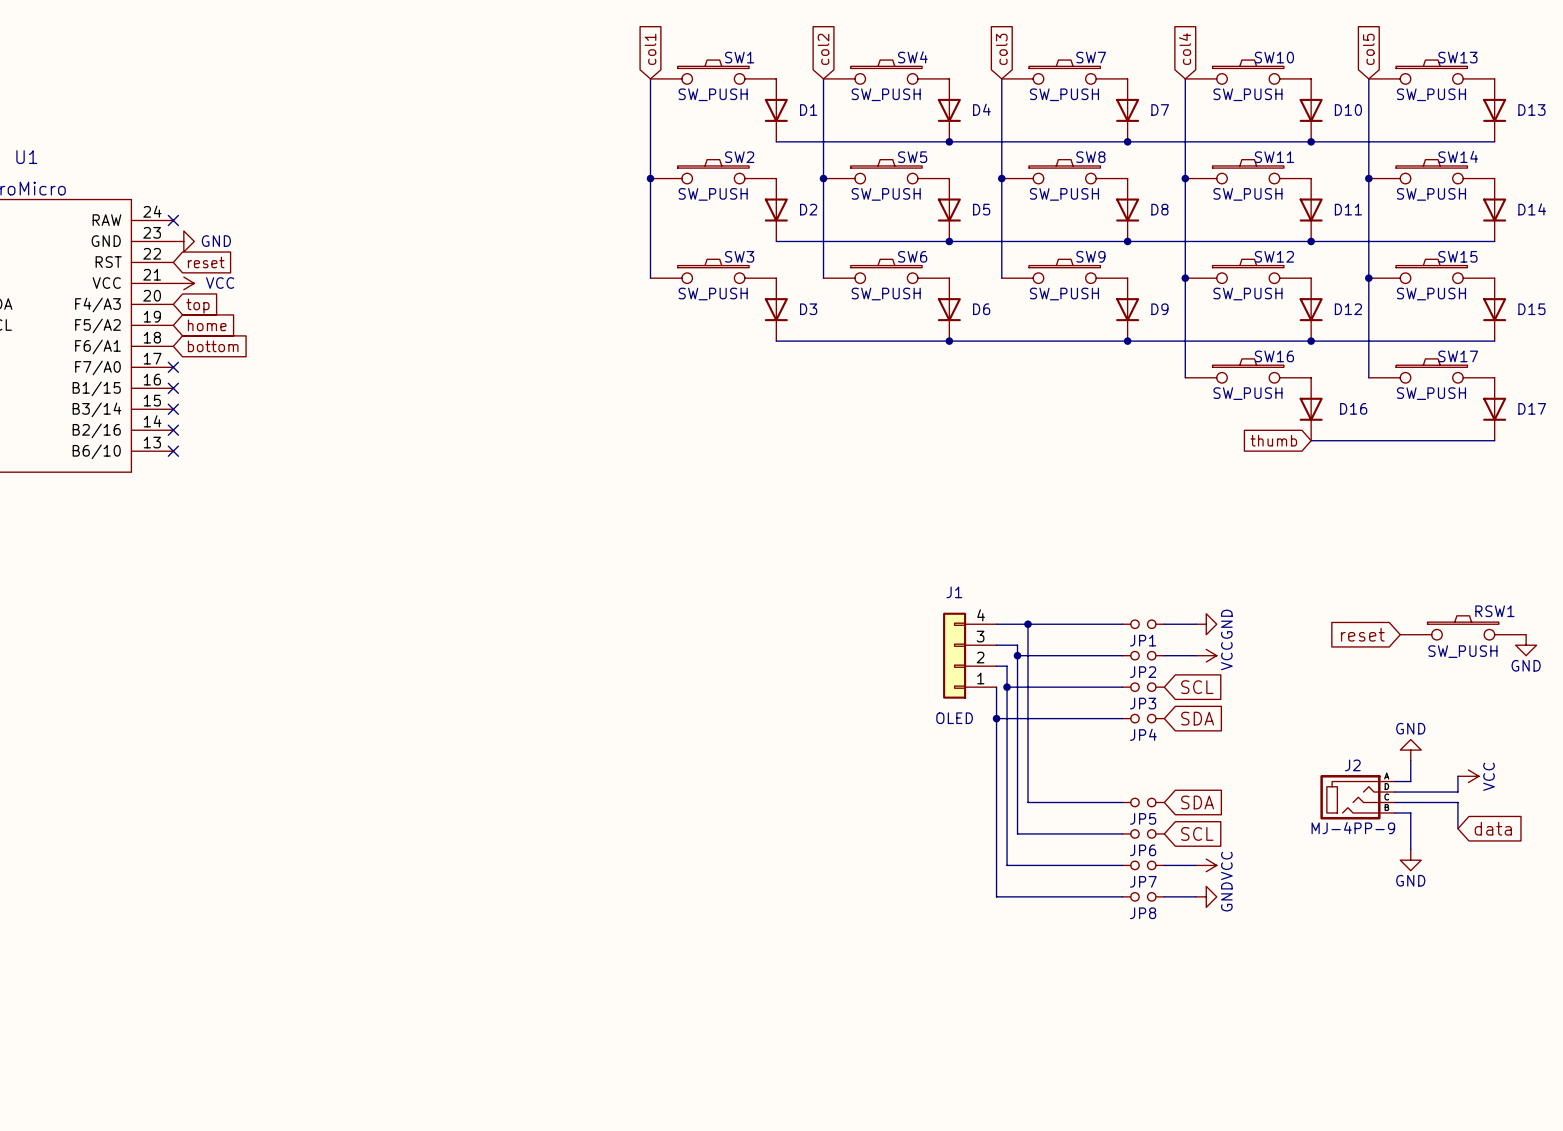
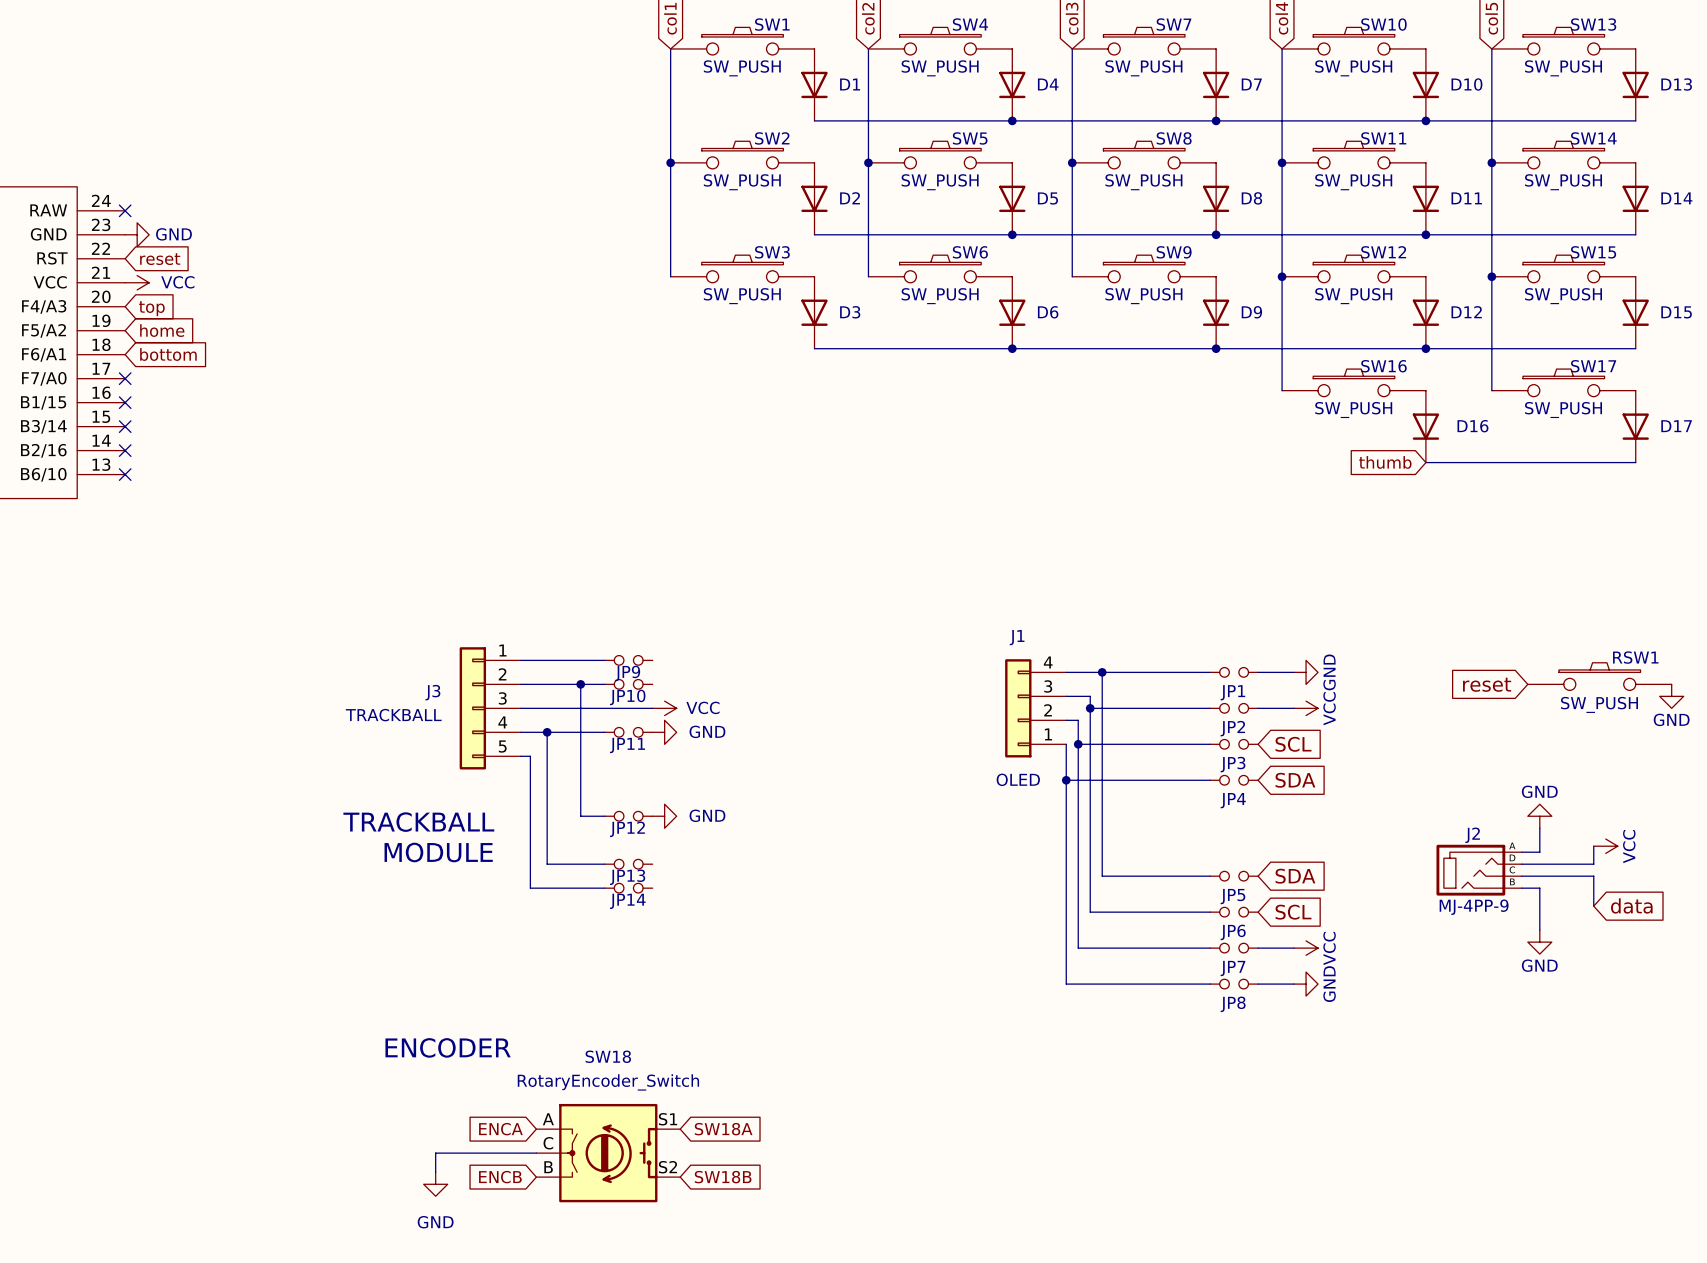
wire: none -> (520, 660) (604, 660)
JP9: none -> (628, 660)
wire: none -> (520, 684) (604, 684)
wire: none -> (580, 684) (580, 816) (604, 816)
junction: none -> (580, 684)
JP10: none -> (628, 684)
J3: none -> TRACKBALL (490, 708)
wire: none -> (520, 708) (652, 708)
power symbol: none -> VCC (664, 708)
wire: none -> (520, 732) (604, 732)
wire: none -> (547, 732) (547, 864) (604, 864)
junction: none -> (547, 732)
JP11: none -> (628, 732)
power symbol: none -> GND (664, 732)
wire: none -> (520, 756) (530, 756) (530, 888) (604, 888)
JP12: none -> (628, 816)
power symbol: none -> GND (664, 816)
text: none -> TRACKBALL (418, 822)
text: none -> MODULE (438, 852)
JP13: none -> (628, 864)
JP14: none -> (628, 888)
text: none -> ENCODER (448, 1047)
global label: none -> ENCA (500, 1129)
global label: none -> SW18A (723, 1129)
wire: none -> (536, 1153) (435, 1153) (435, 1172)
SW18: none -> RotaryEncoder_Switch (608, 1153)
global label: none -> ENCB (500, 1177)
global label: none -> SW18B (723, 1177)
power symbol: none -> GND (435, 1184)

